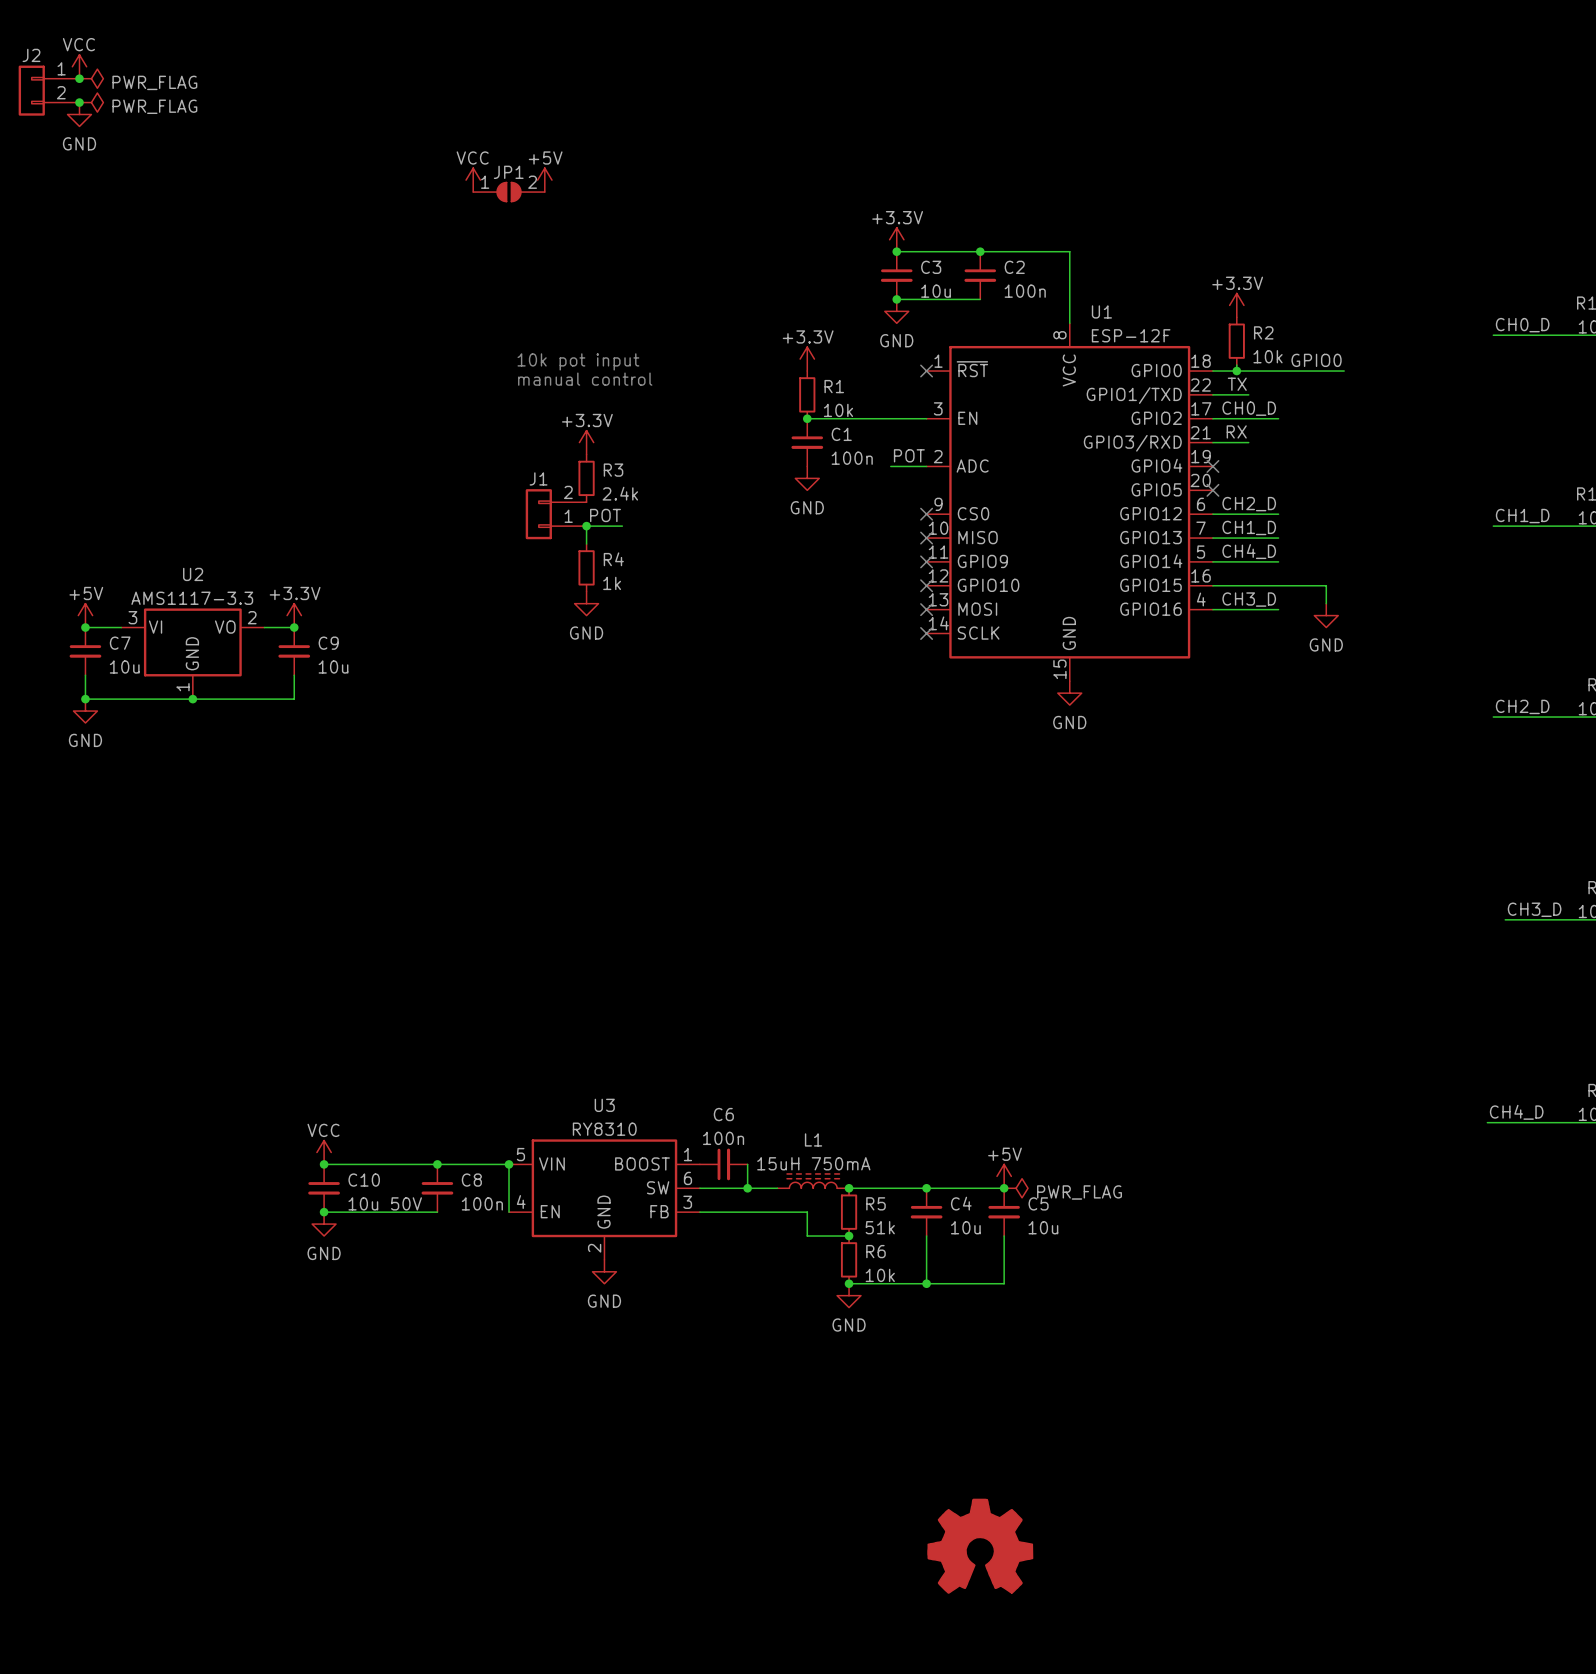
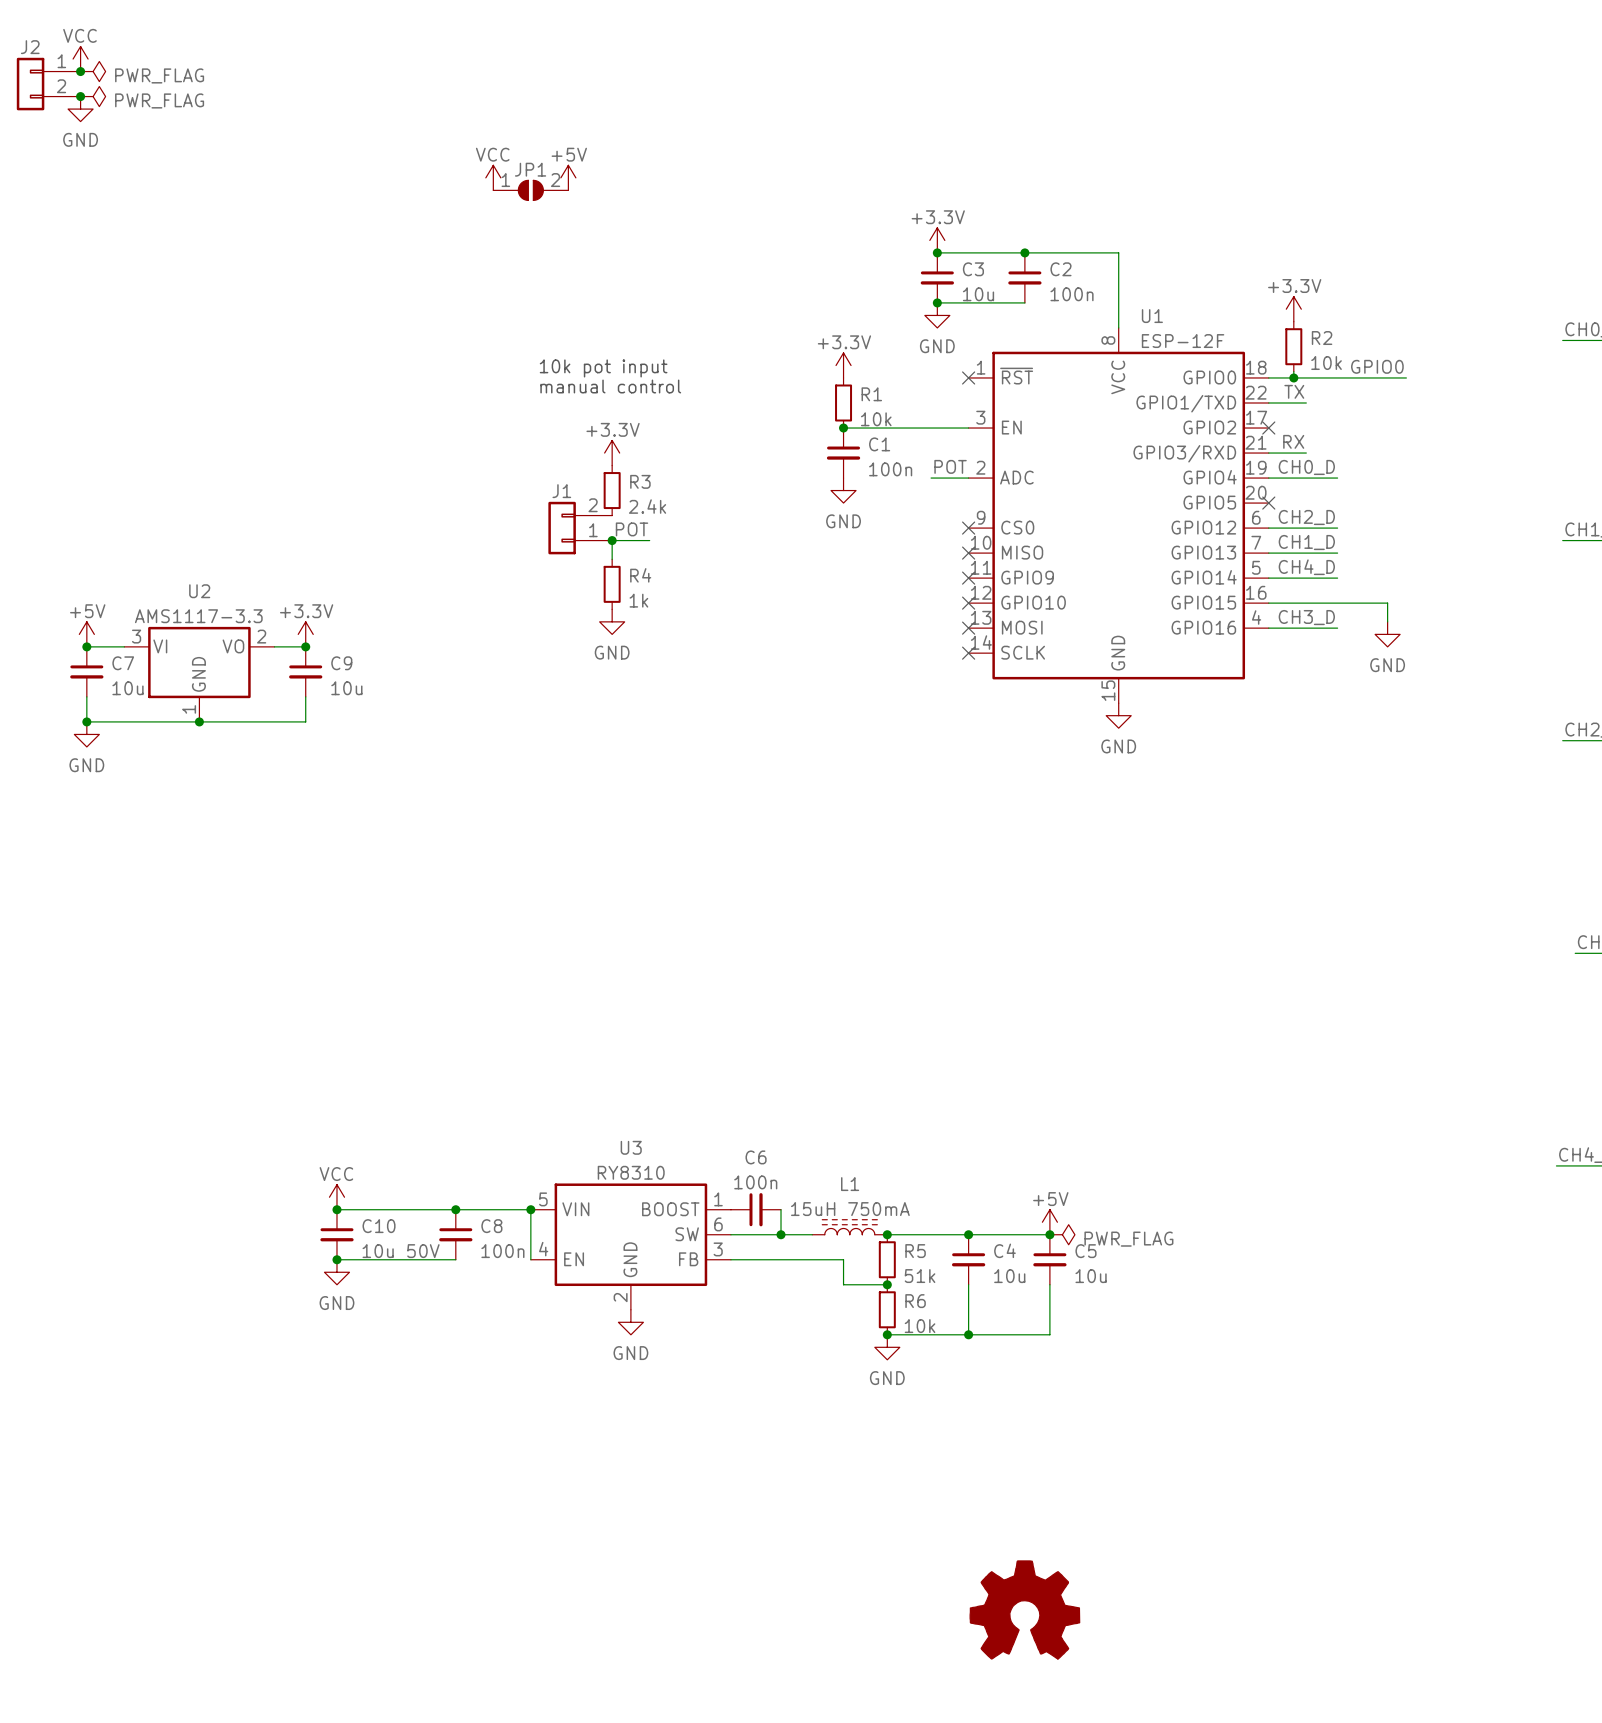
label position: CH0_D (1249, 408) -> CH0_D (1306, 467)
wire: (1212, 418) (1278, 418) -> (1268, 478) (1337, 478)
no-connect mark position: (1212, 466) -> (1268, 428)

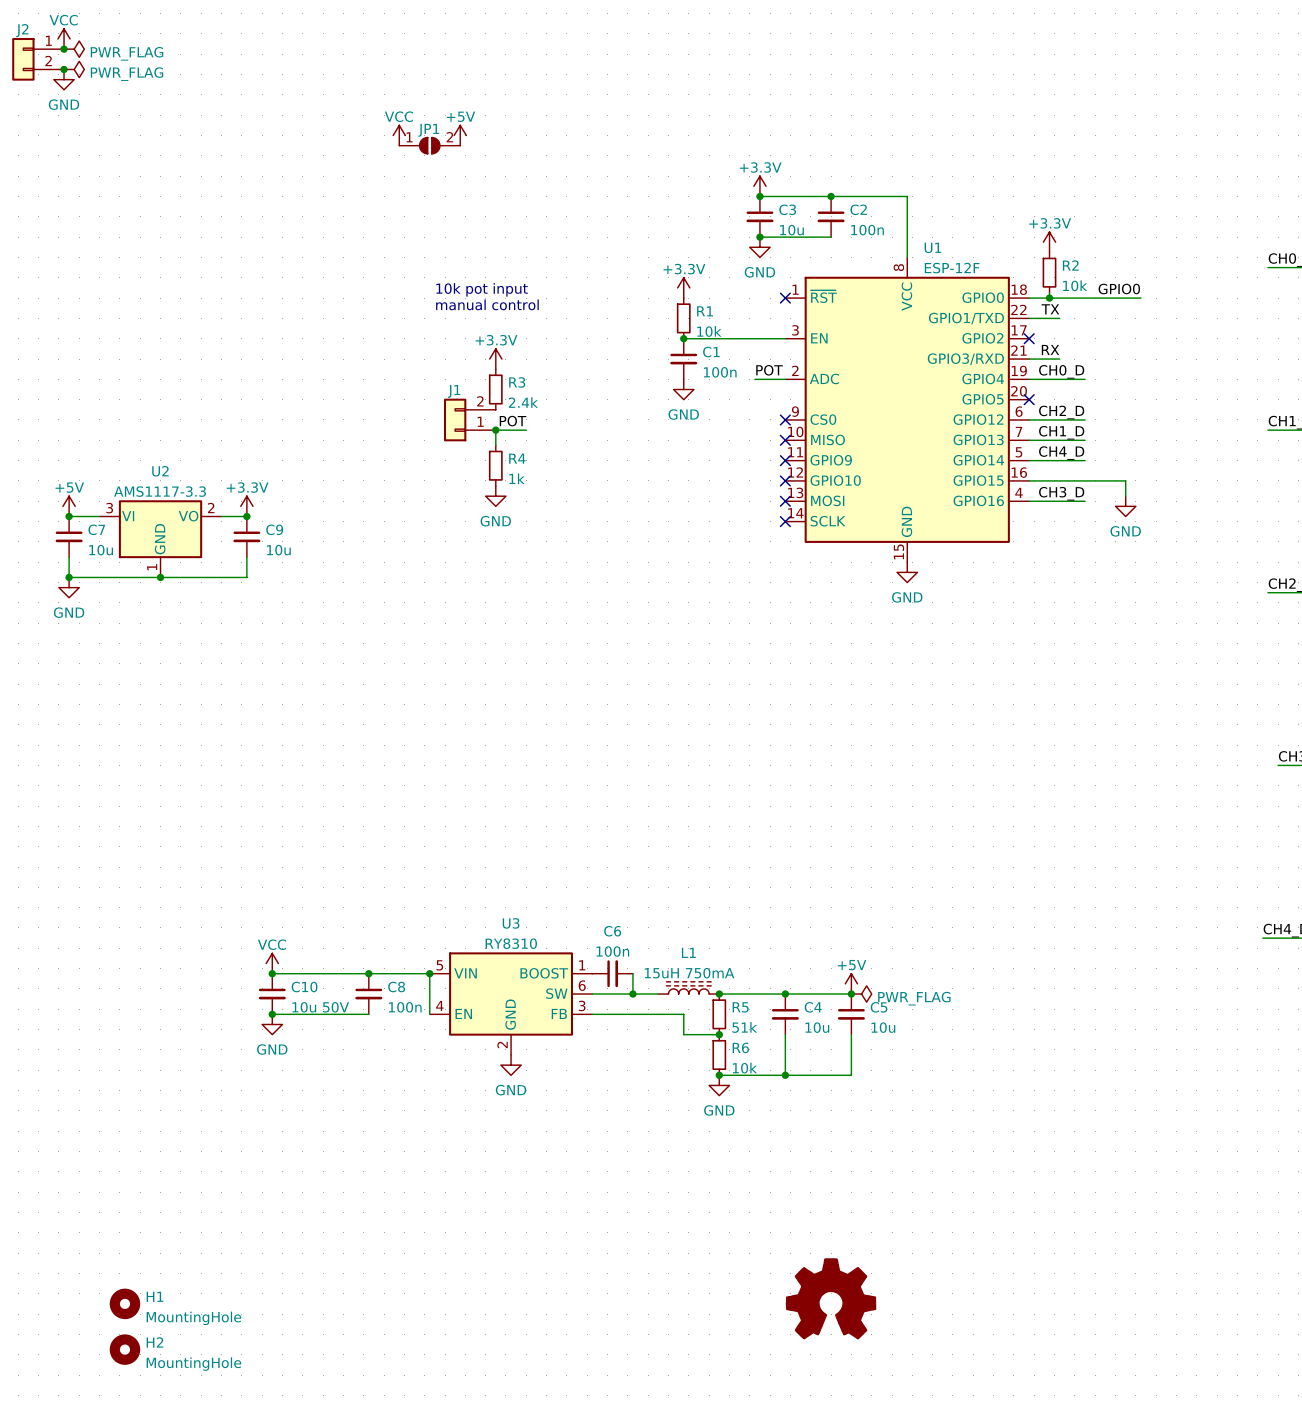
H1: none -> MountingHole (124, 1303)
H2: none -> MountingHole (124, 1349)

